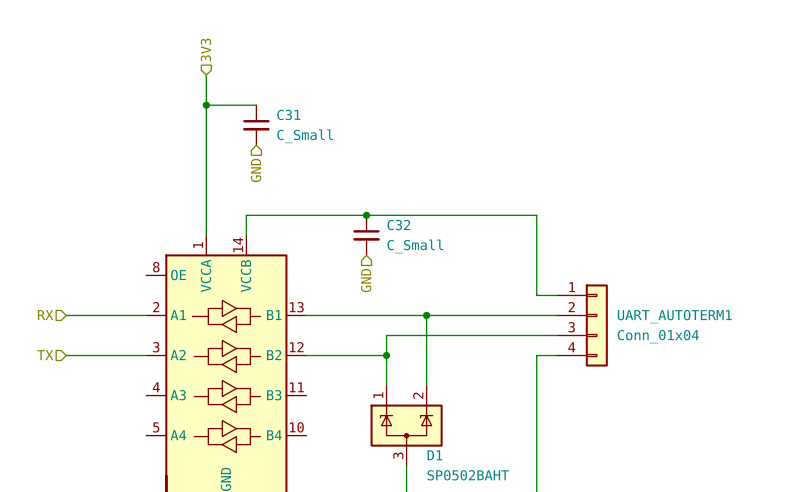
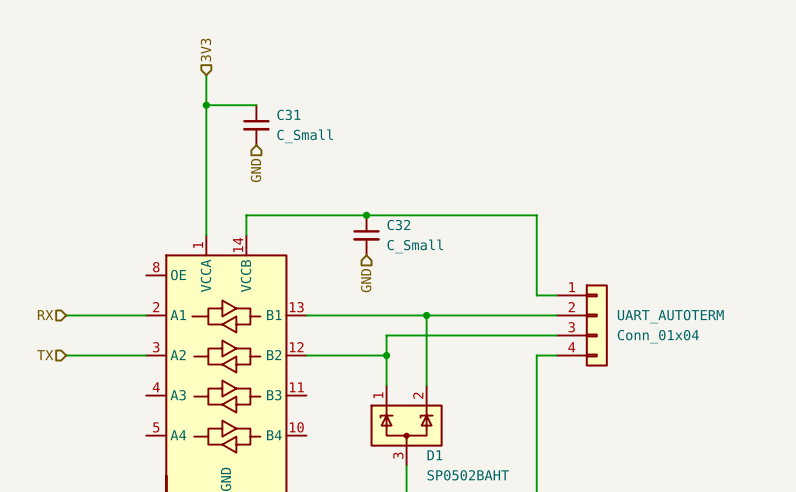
UART_AUTOTERM1 name: UART_AUTOTERM1 (674, 316) -> UART_AUTOTERM (670, 316)

